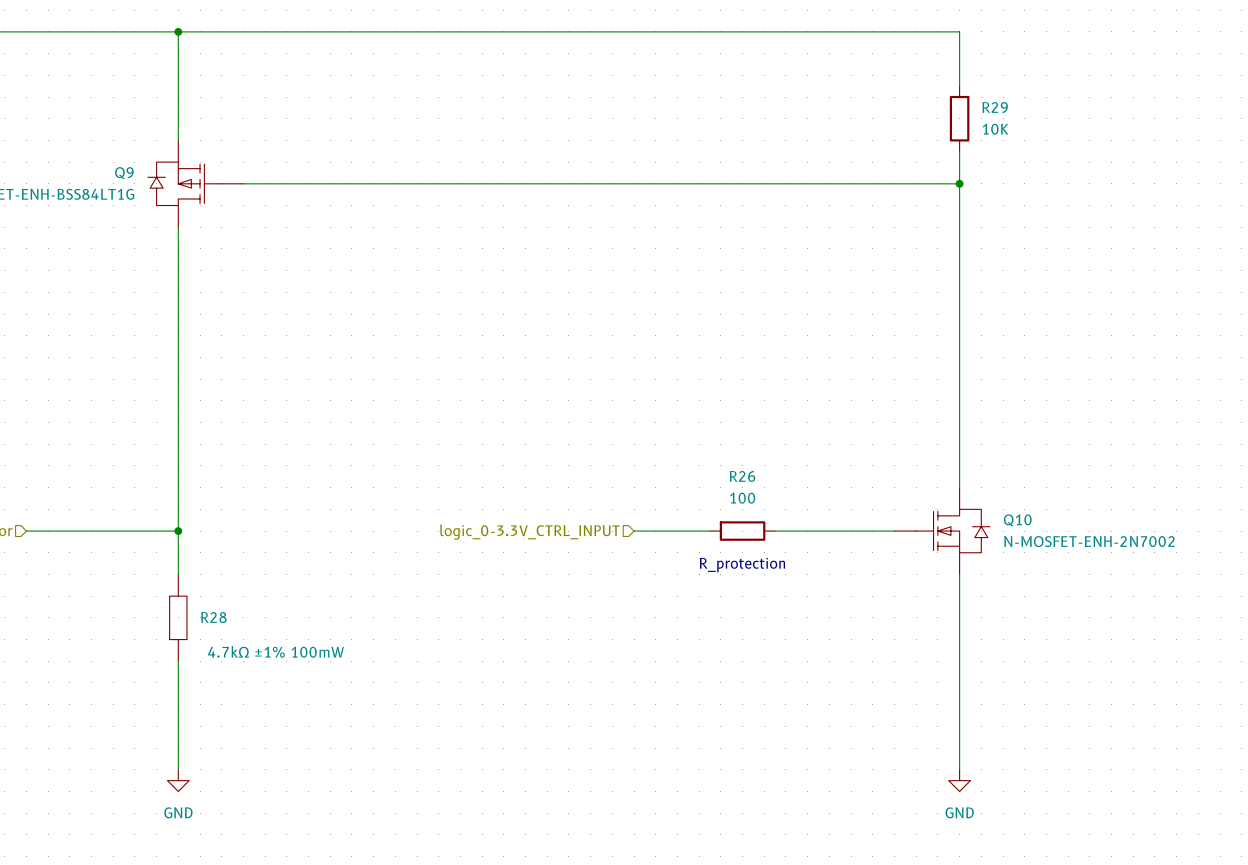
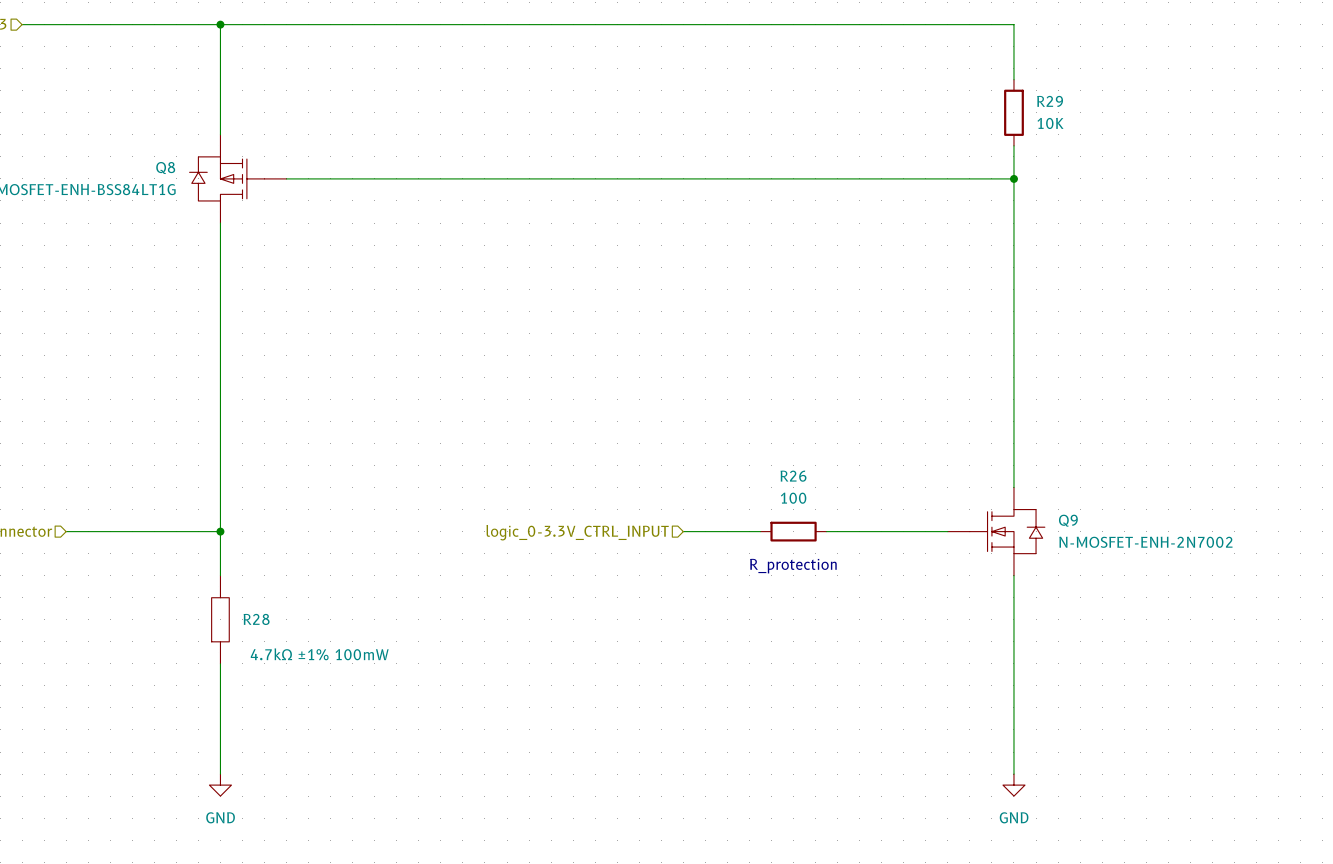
Q9 name: Q9 (124, 173) -> Q8 (165, 168)
Q10 name: Q10 (1017, 520) -> Q9 (1068, 520)

